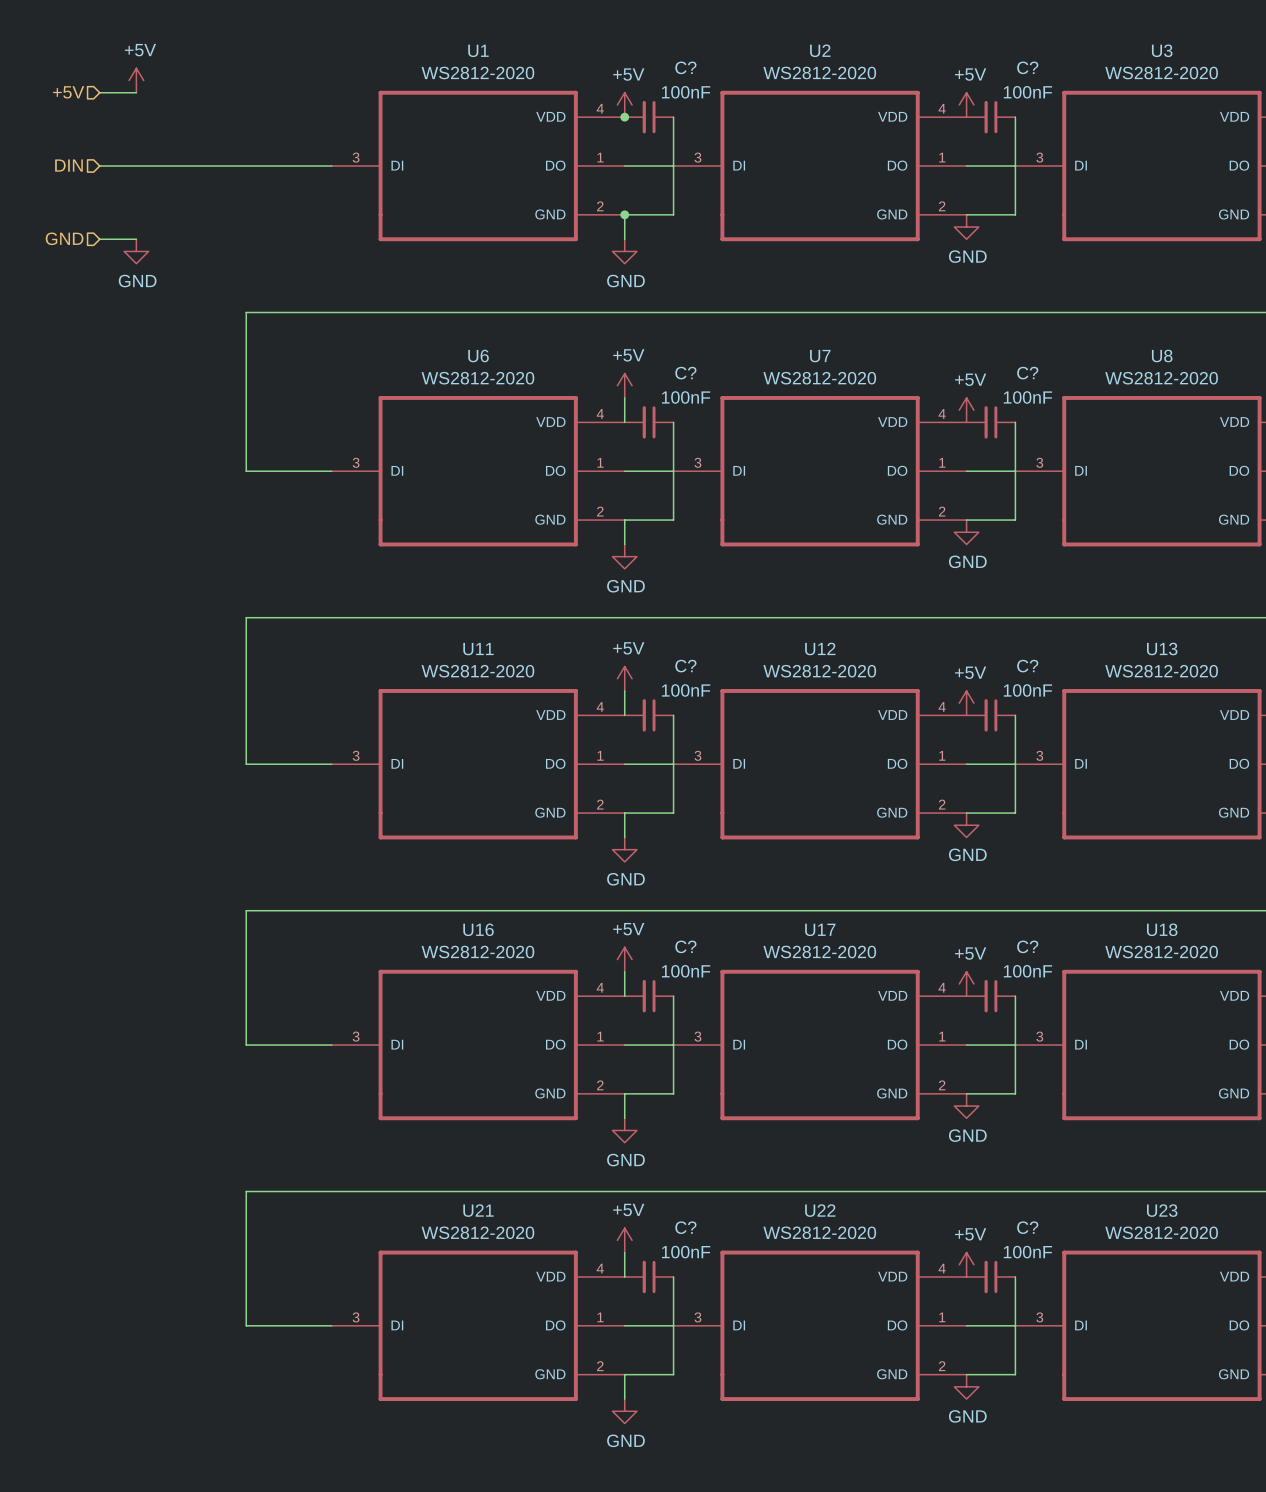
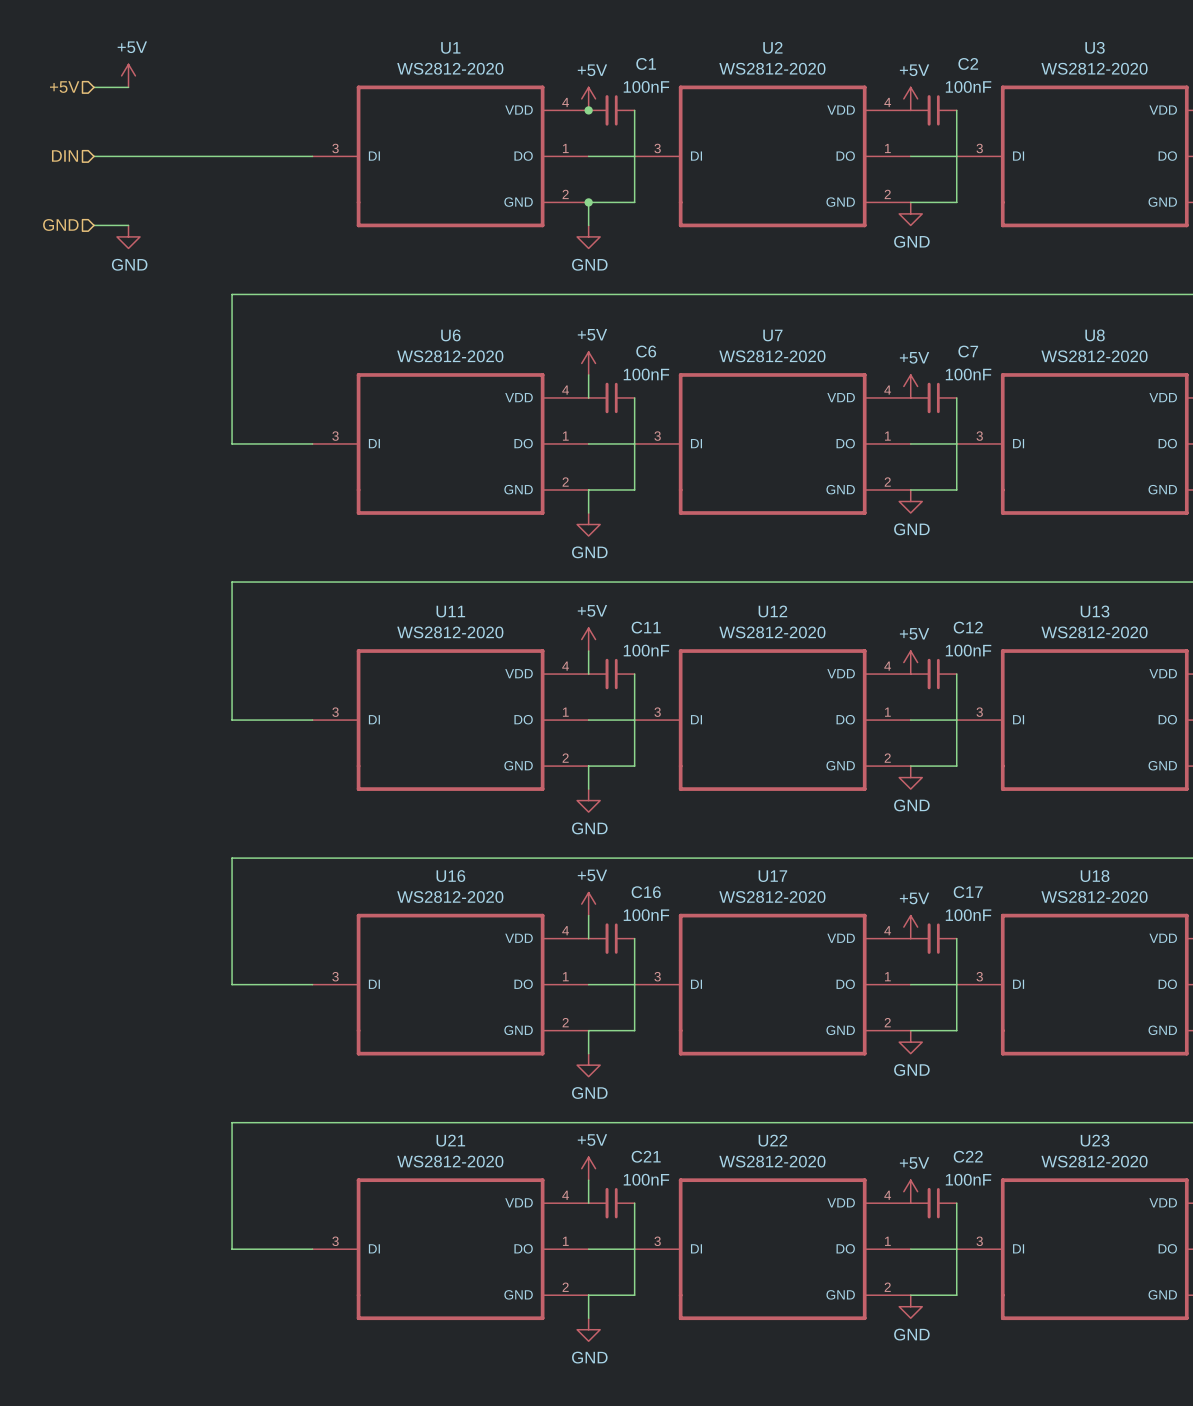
C? name: C? (685, 67) -> C1 (646, 63)
C? name: C? (1027, 67) -> C2 (968, 63)
C? name: C? (685, 373) -> C6 (646, 351)
C? name: C? (1027, 373) -> C7 (968, 351)
C? name: C? (685, 666) -> C11 (646, 627)
C? name: C? (1027, 666) -> C12 (968, 627)
C? name: C? (685, 946) -> C16 (646, 892)
C? name: C? (1027, 946) -> C17 (968, 892)
C? name: C? (685, 1227) -> C21 (646, 1156)
C? name: C? (1027, 1227) -> C22 (968, 1156)

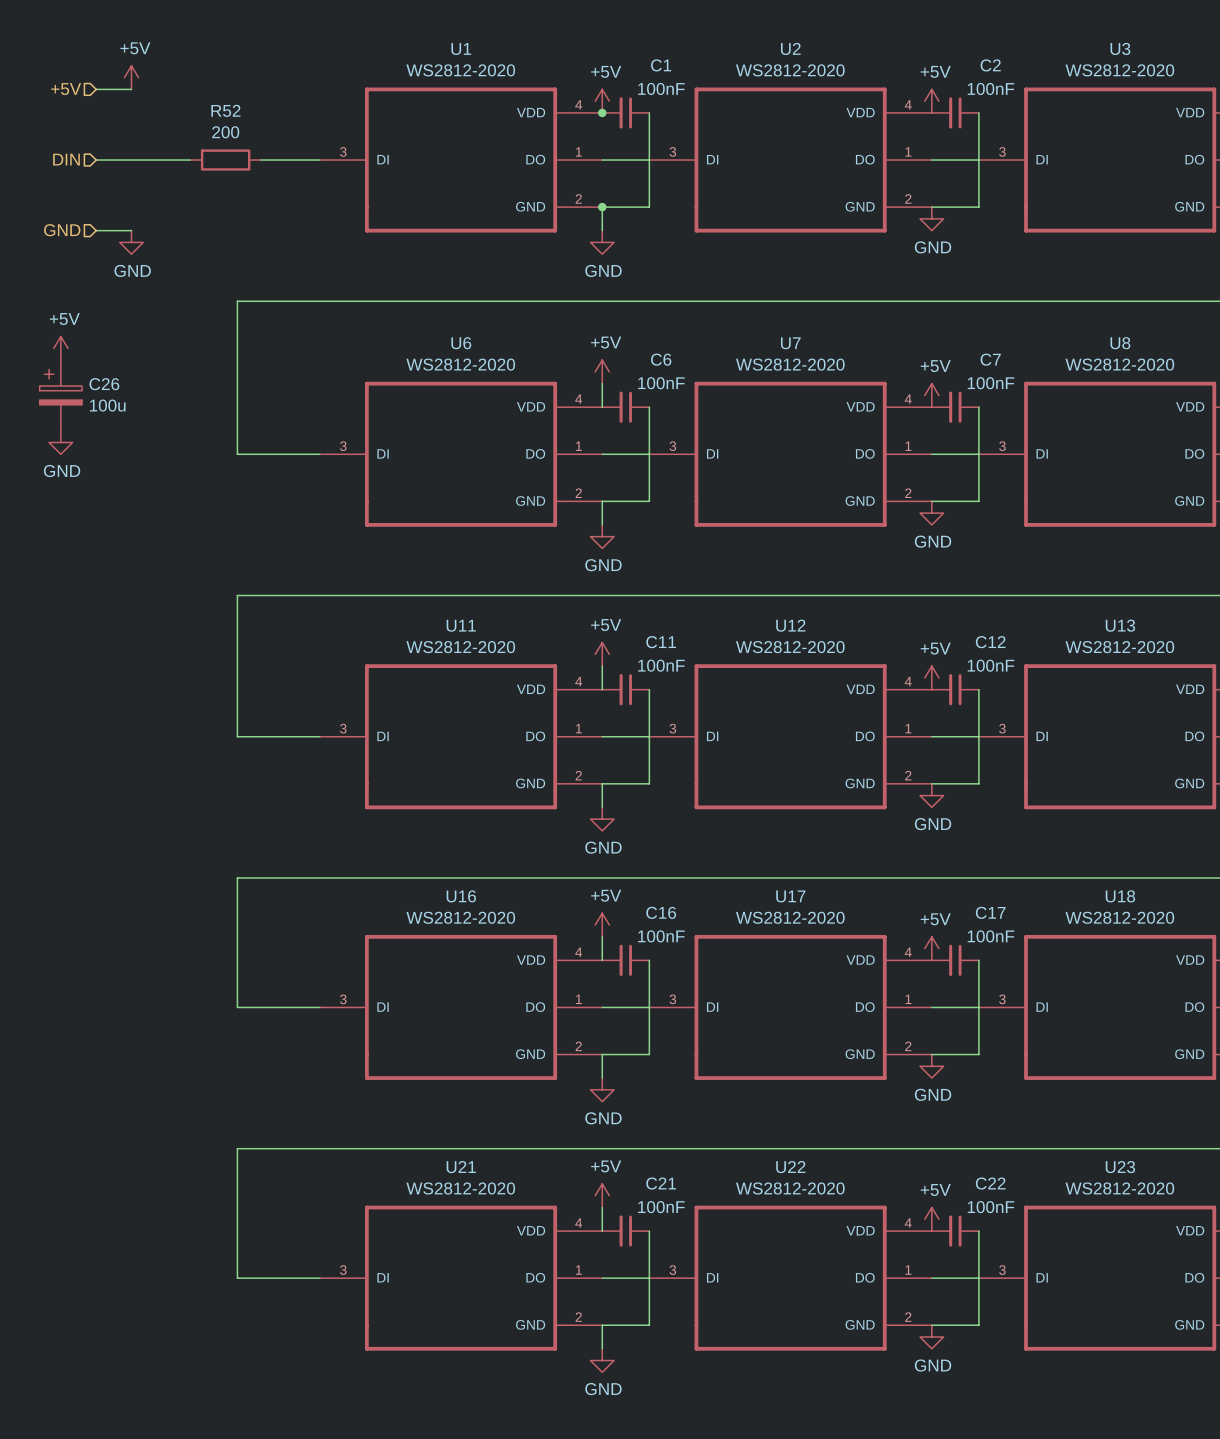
wire: (186, 156) (255, 156) -> none
R52: none -> 200 (225, 160)
power symbol: none -> +5V (60, 348)
C26: none -> 100u (60, 395)
power symbol: none -> GND (60, 442)

